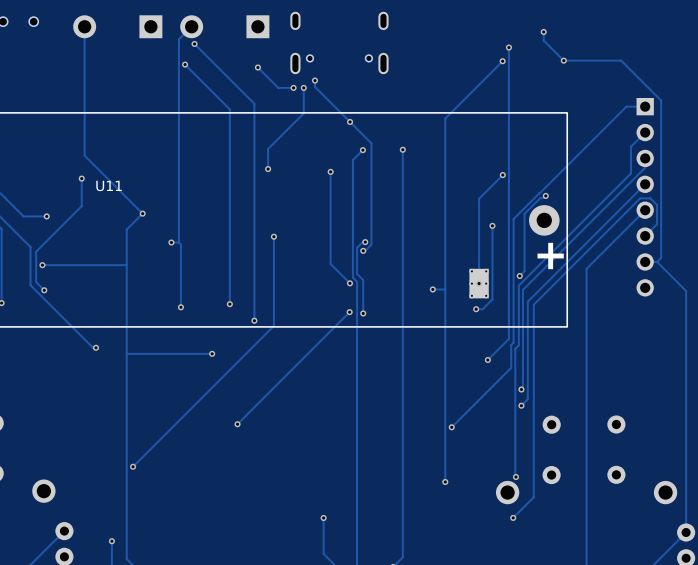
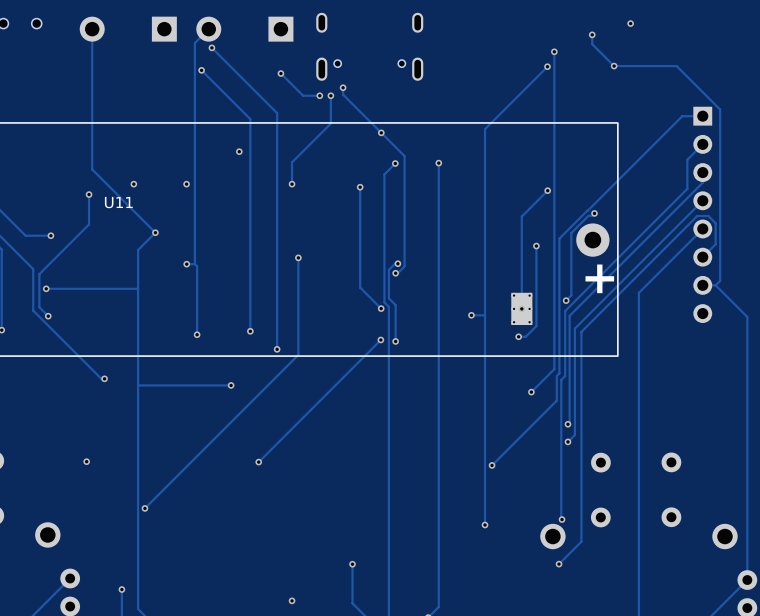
via: none -> (630, 23)
via: none -> (239, 151)
via: none -> (133, 184)
via: none -> (186, 184)
via: none -> (86, 461)
via: none -> (292, 600)

